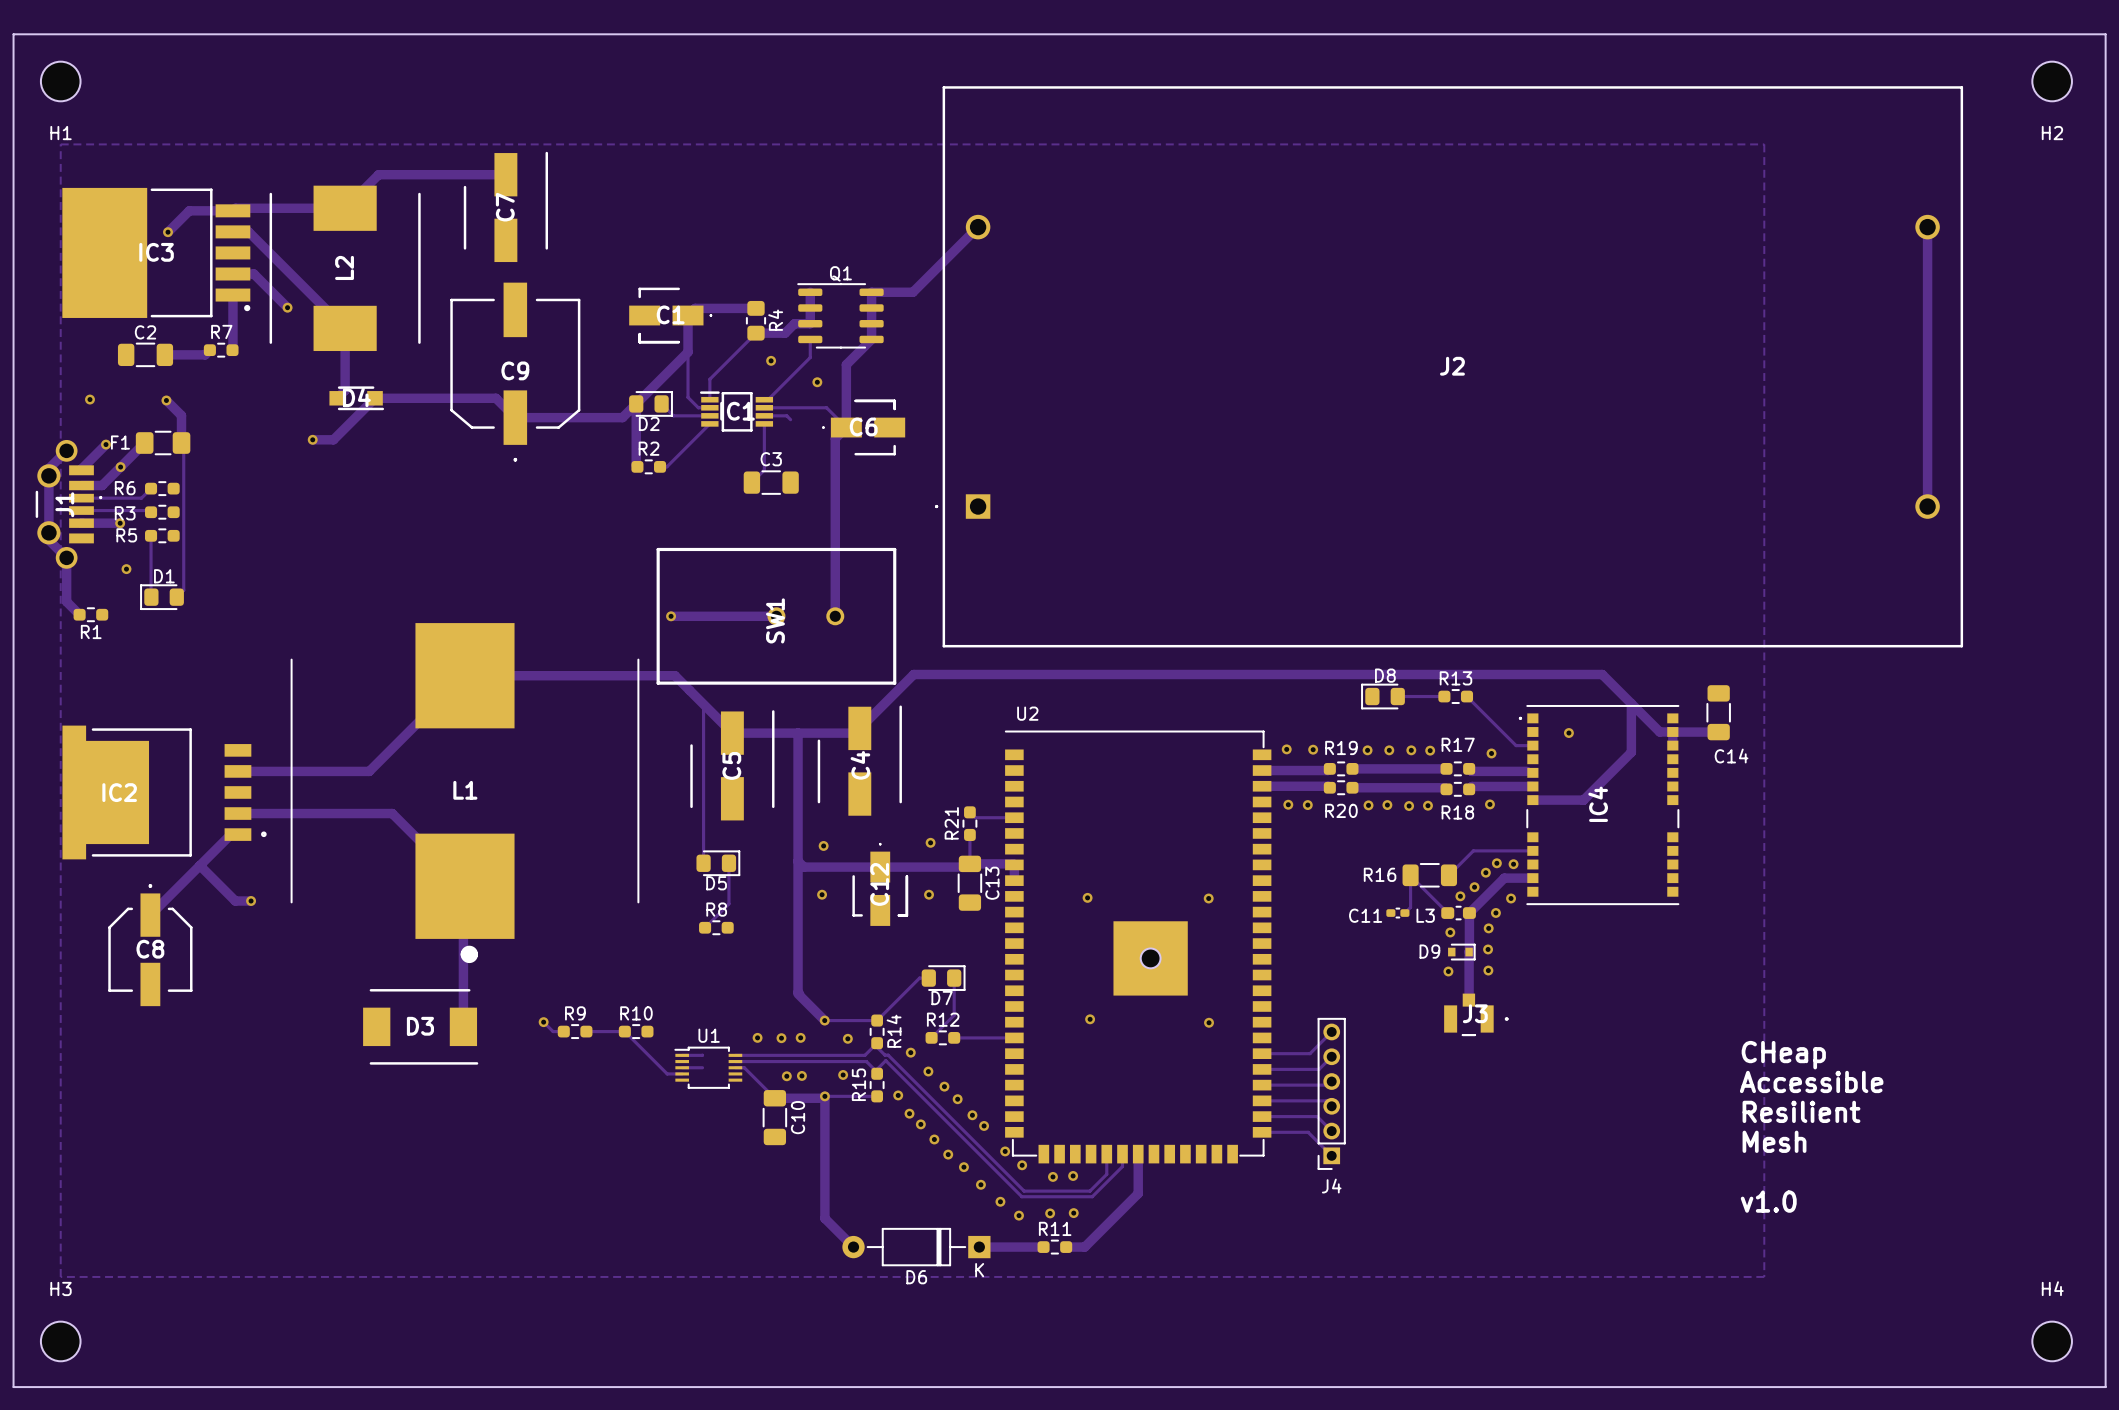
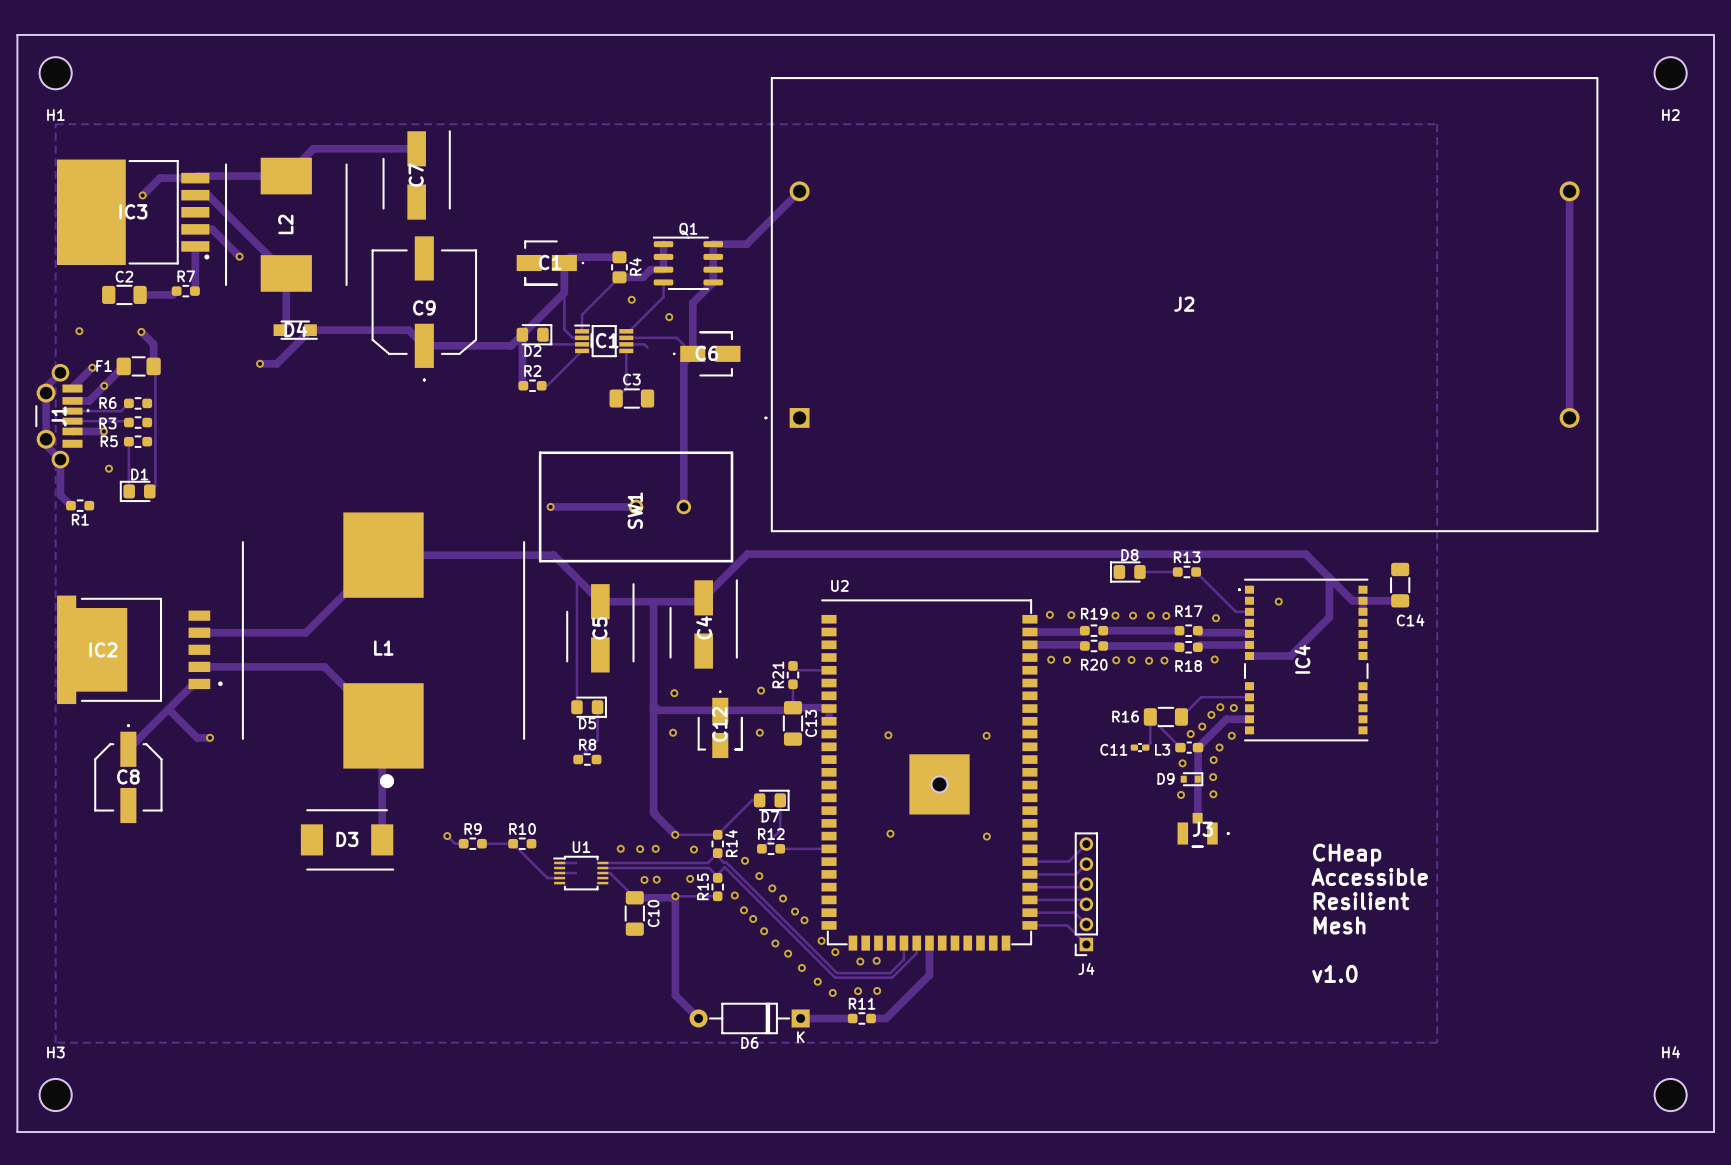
text position: CHeap (1783, 1055) -> CHeap (1347, 855)
text position: Accessible (1811, 1081) -> Accessible (1369, 876)
text position: Resilient (1801, 1111) -> Resilient (1361, 901)
text position: Mesh (1774, 1141) -> Mesh (1339, 925)
text position: v1.0 (1768, 1201) -> v1.0 (1334, 973)

